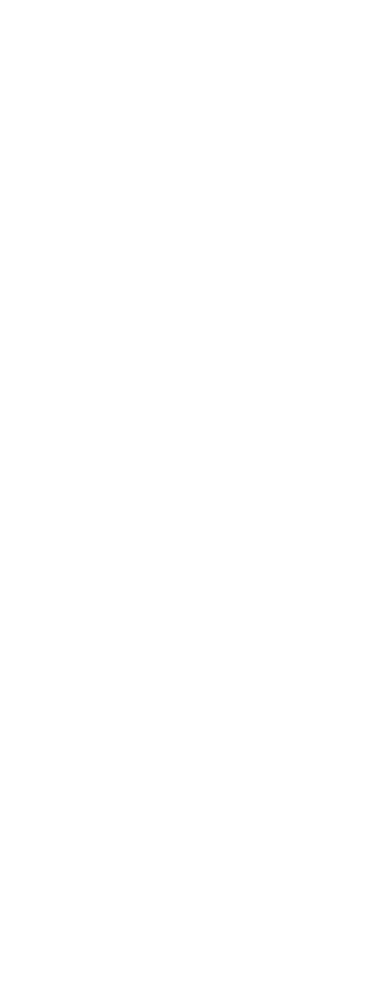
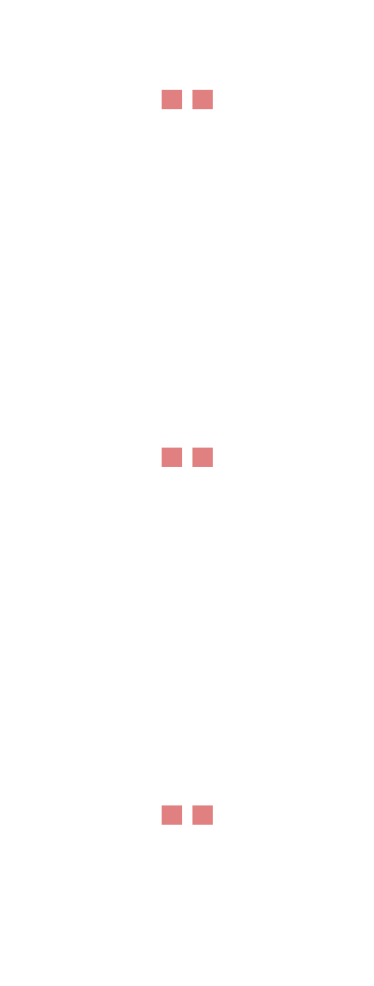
part: none -> (187, 99)
part: none -> (187, 457)
part: none -> (187, 815)

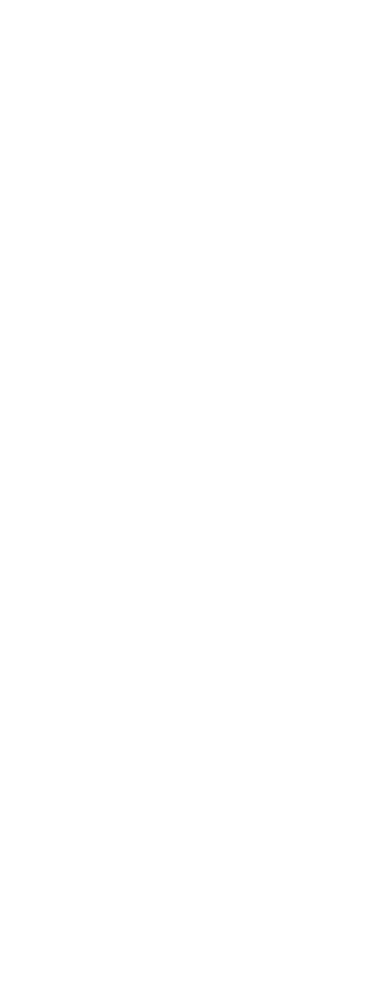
part: (187, 99) -> none
part: (187, 457) -> none
part: (187, 815) -> none

